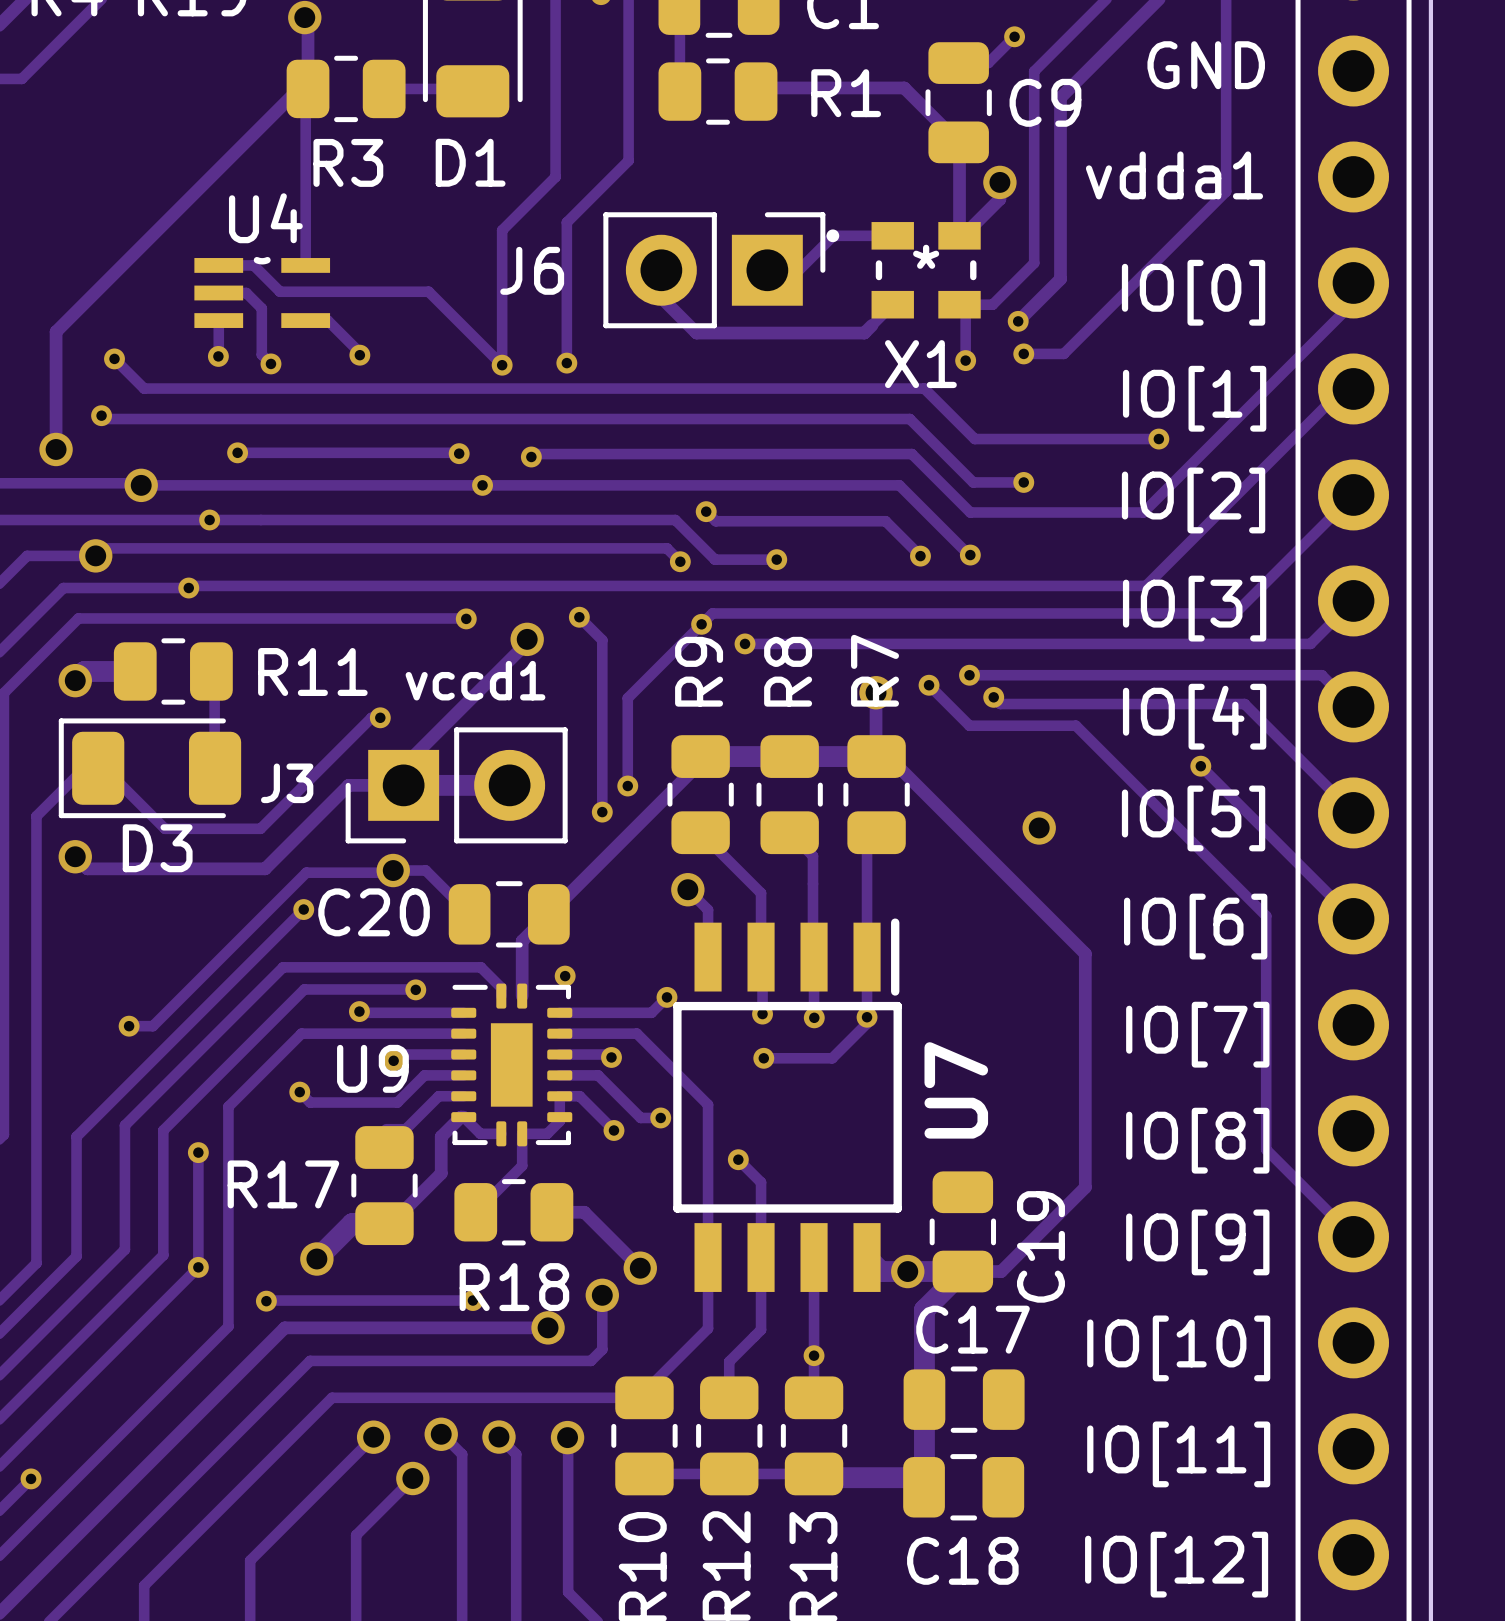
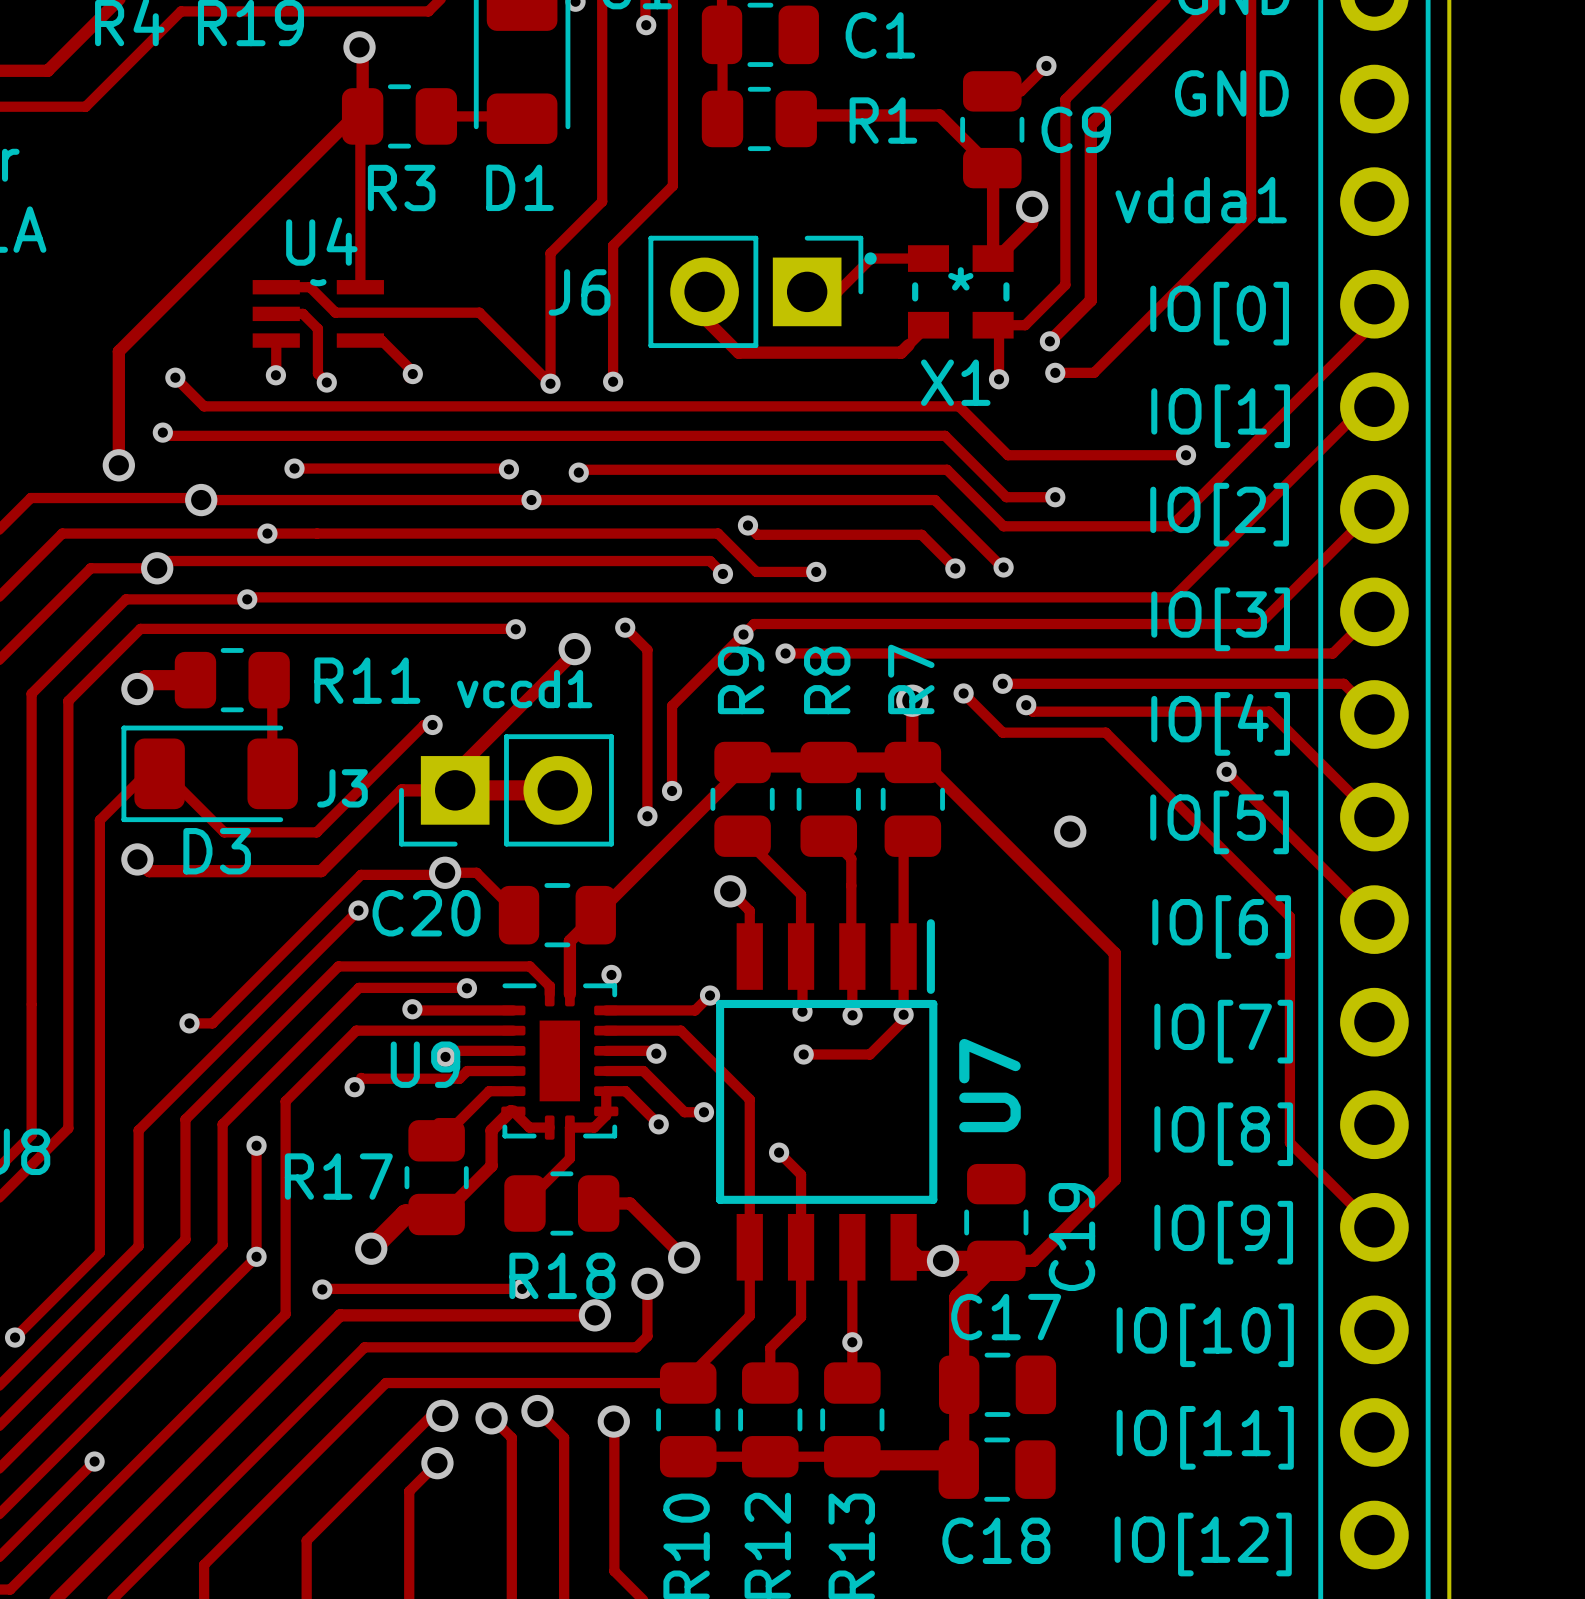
track: (424, 1075) (397, 1102) (310, 1102) (299, 1092) -> (475, 1071) (467, 1071) (459, 1078) (361, 1077)
via position: (373, 1437) -> (442, 1415)
via position: (498, 1437) -> (537, 1411)
track: (412, 1478) (356, 1535) -> (437, 1463) (409, 1491) (409, 1516)
via position: (412, 1478) -> (437, 1463)

